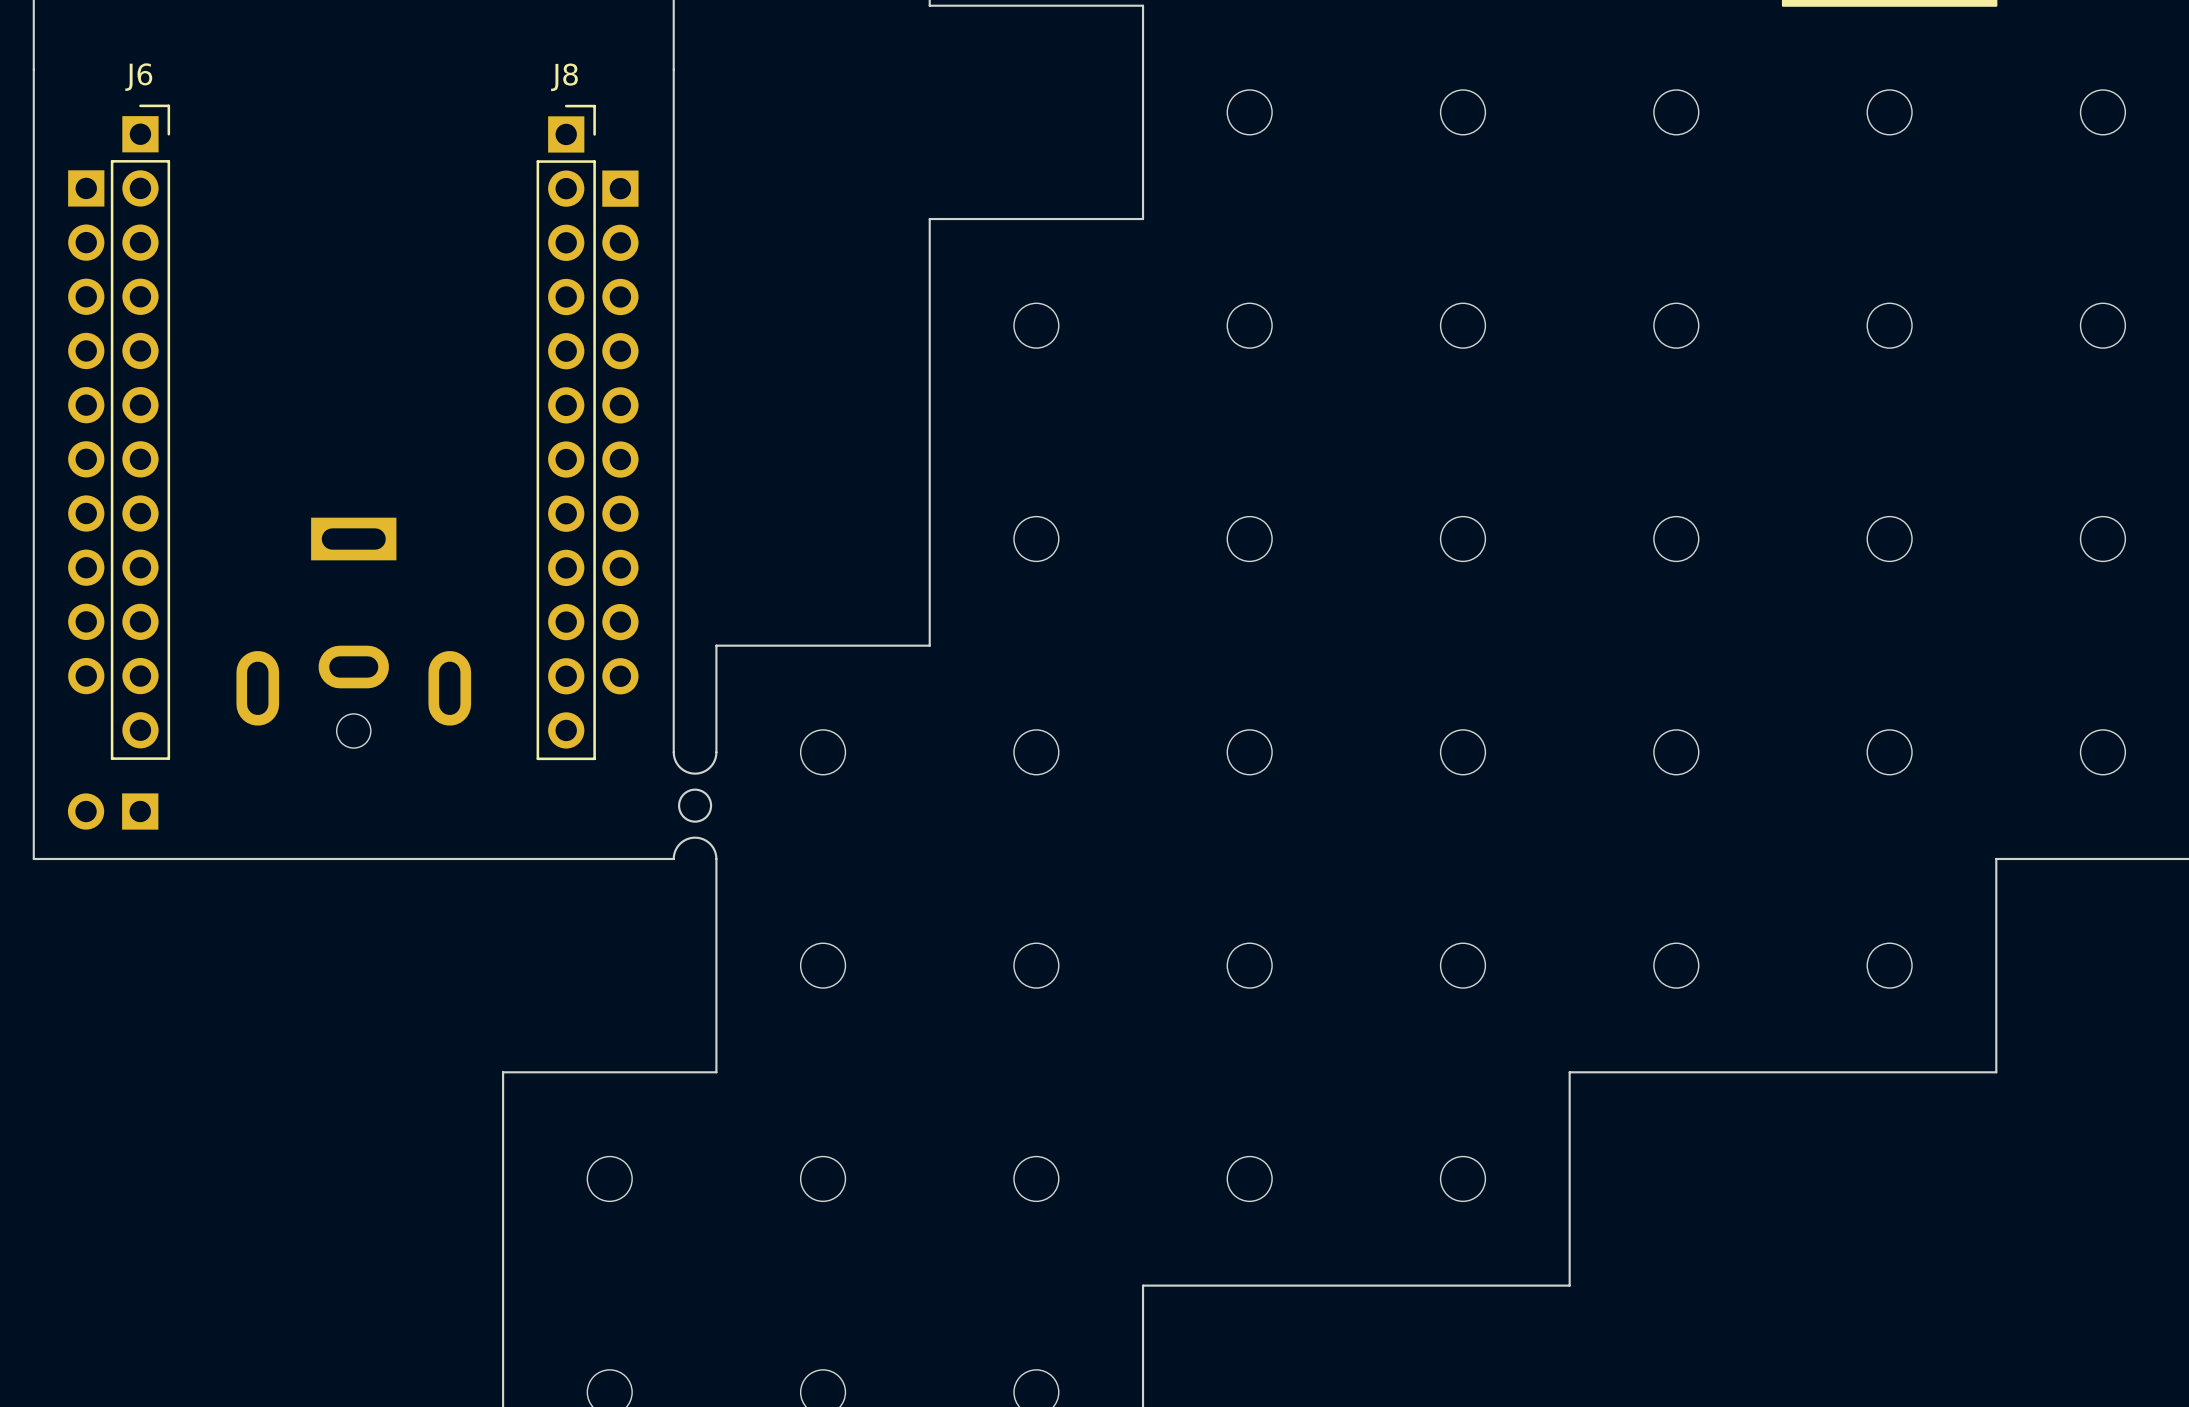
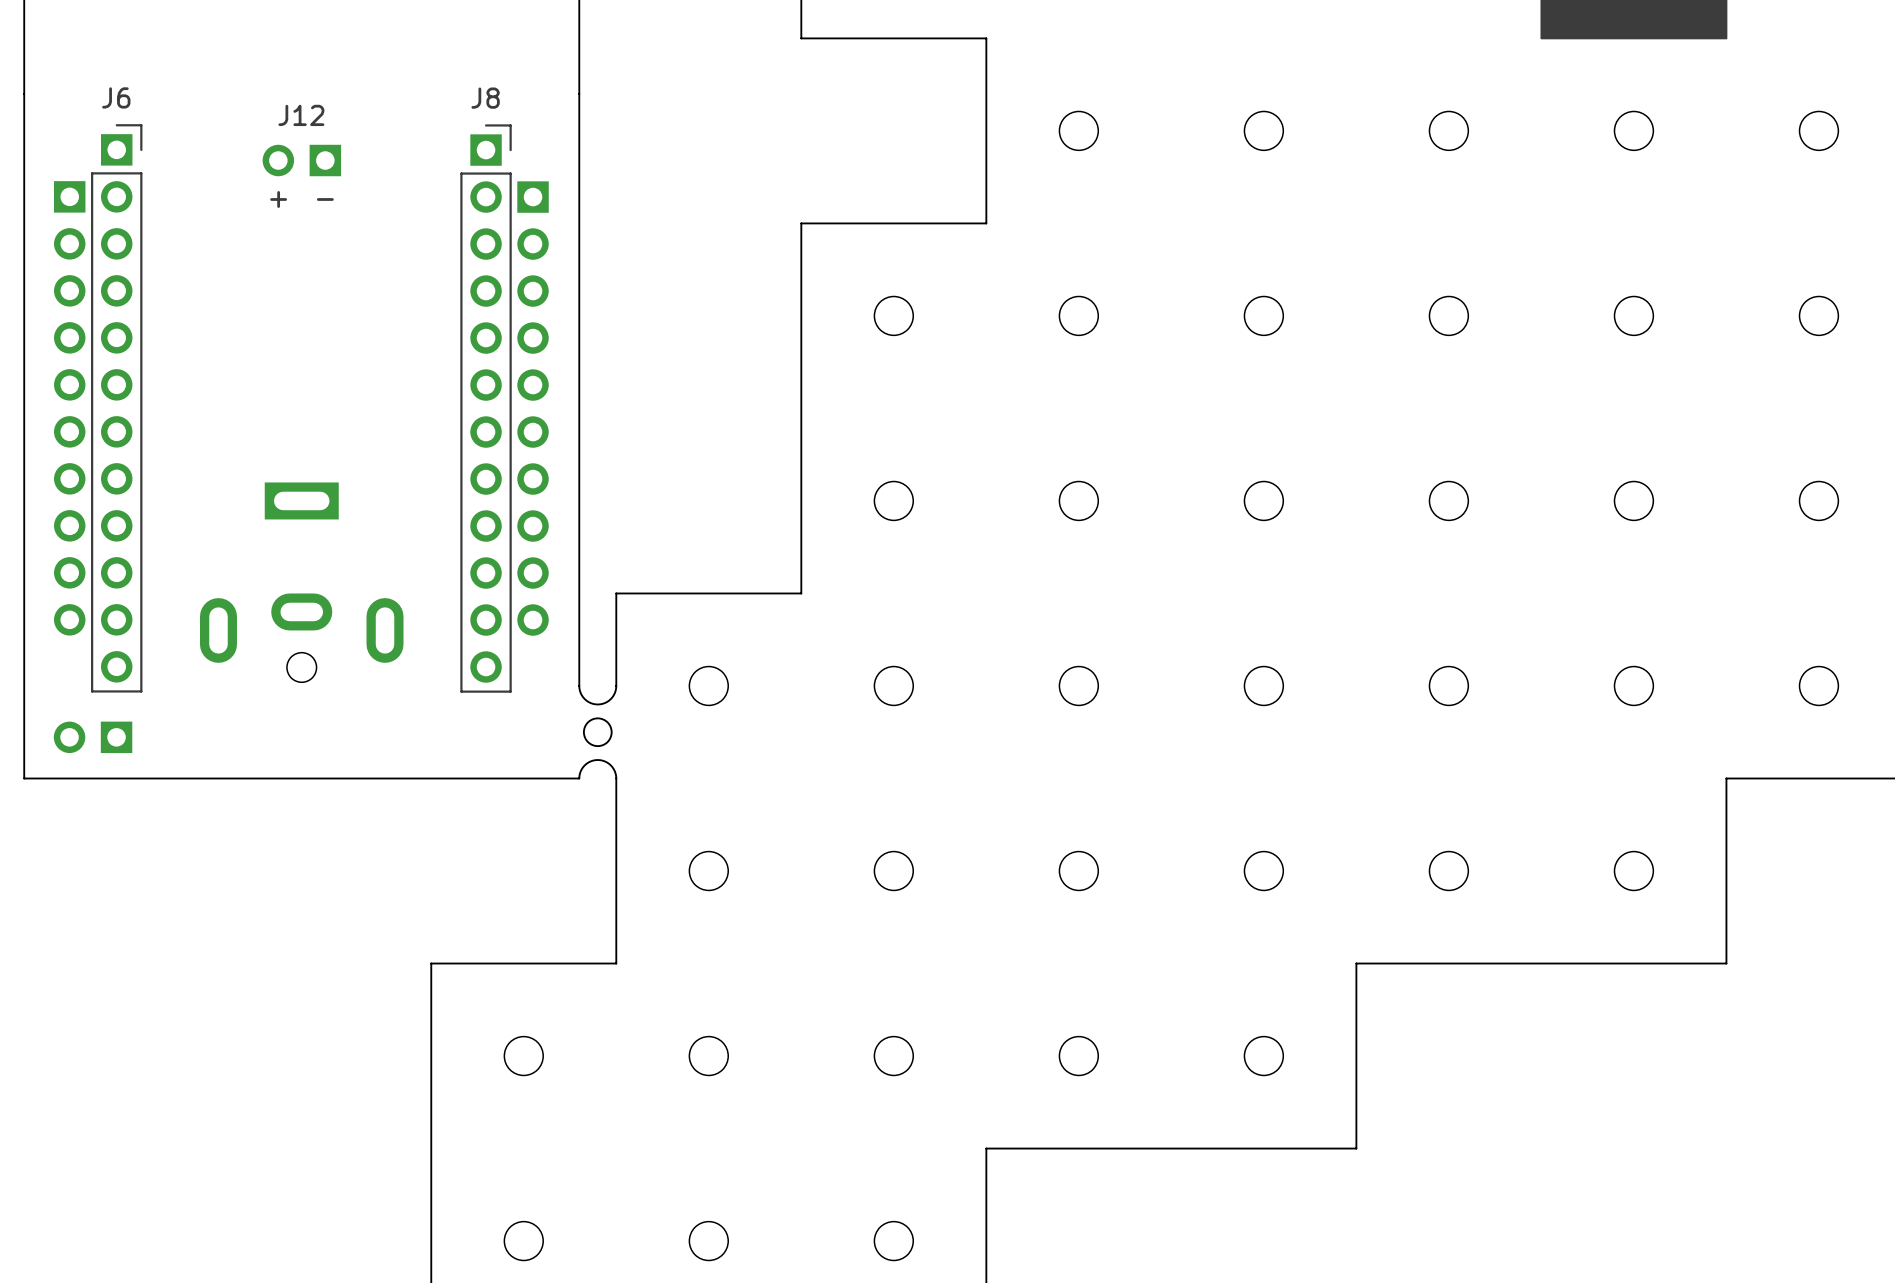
J12: none -> (301, 160)
text: none -> + (278, 199)
text: none -> - (325, 199)

